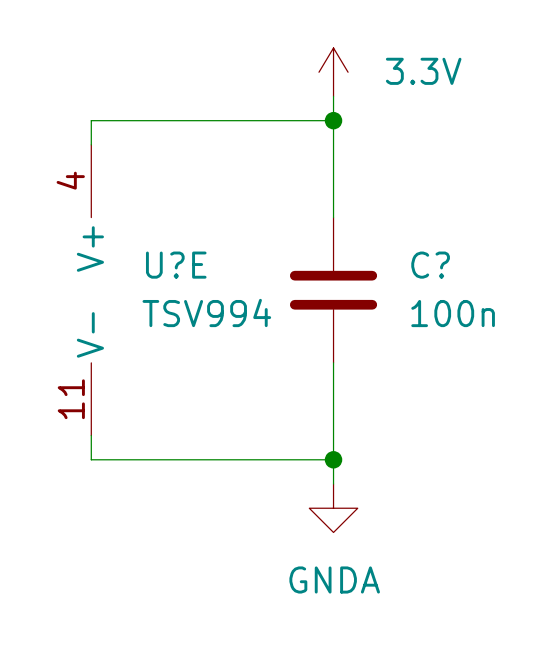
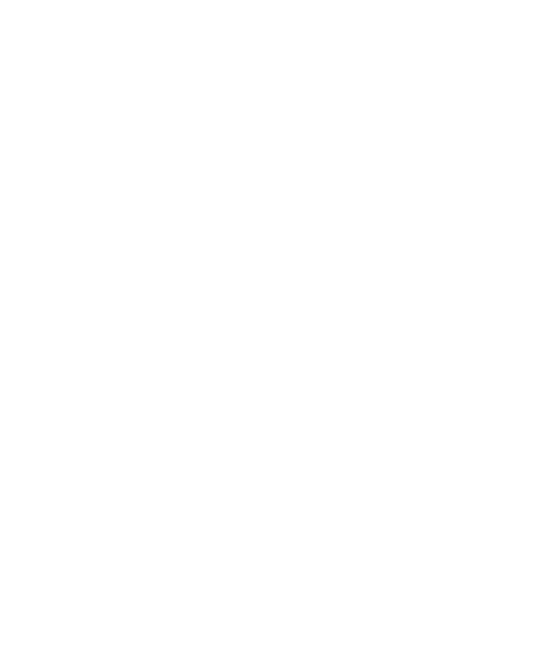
power symbol: 3.3V (333, 72) -> none
wire: (333, 96) (333, 217) -> none
wire: (333, 120) (91, 120) (91, 144) -> none
junction: (333, 120) -> none
U?E: TSV994 (91, 290) -> none
C?: 100n (333, 290) -> none
wire: (333, 362) (333, 484) -> none
wire: (91, 435) (91, 459) (333, 459) -> none
junction: (333, 459) -> none
power symbol: GNDA (333, 508) -> none

